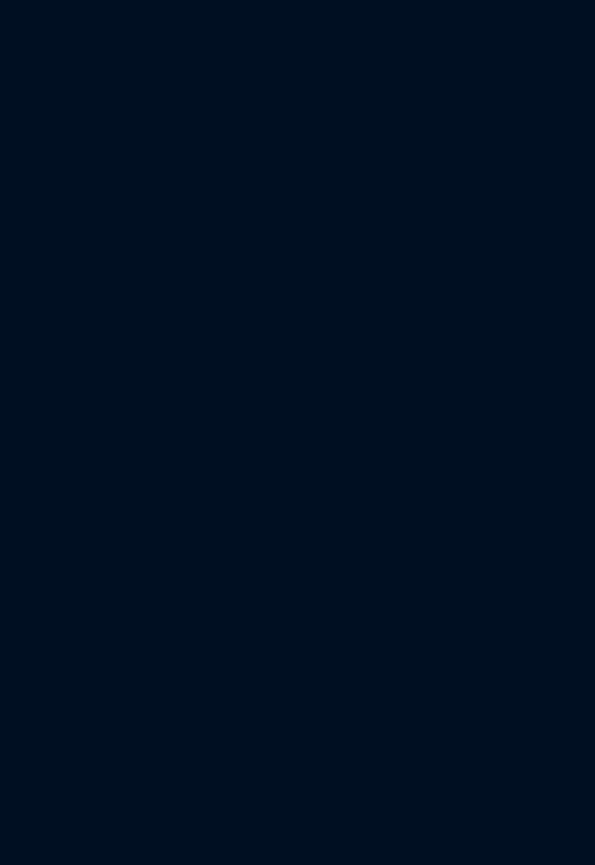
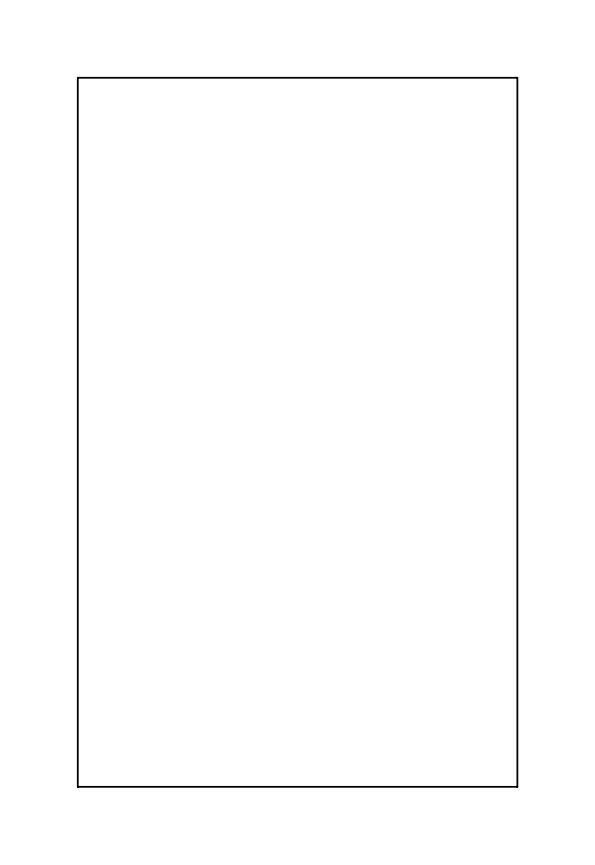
board edge: none -> (517, 77) (77, 77) (77, 786) (517, 786) (517, 77)

